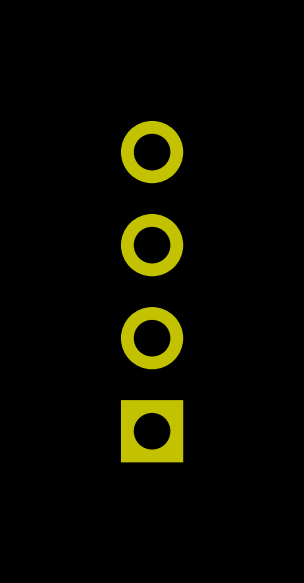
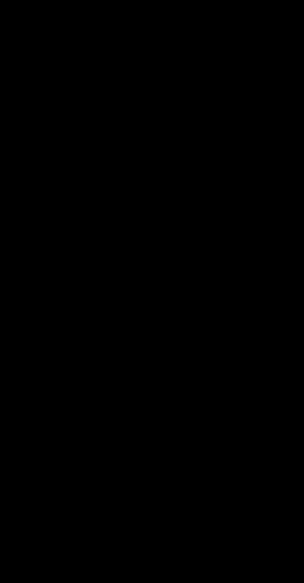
part: (152, 291) -> none

